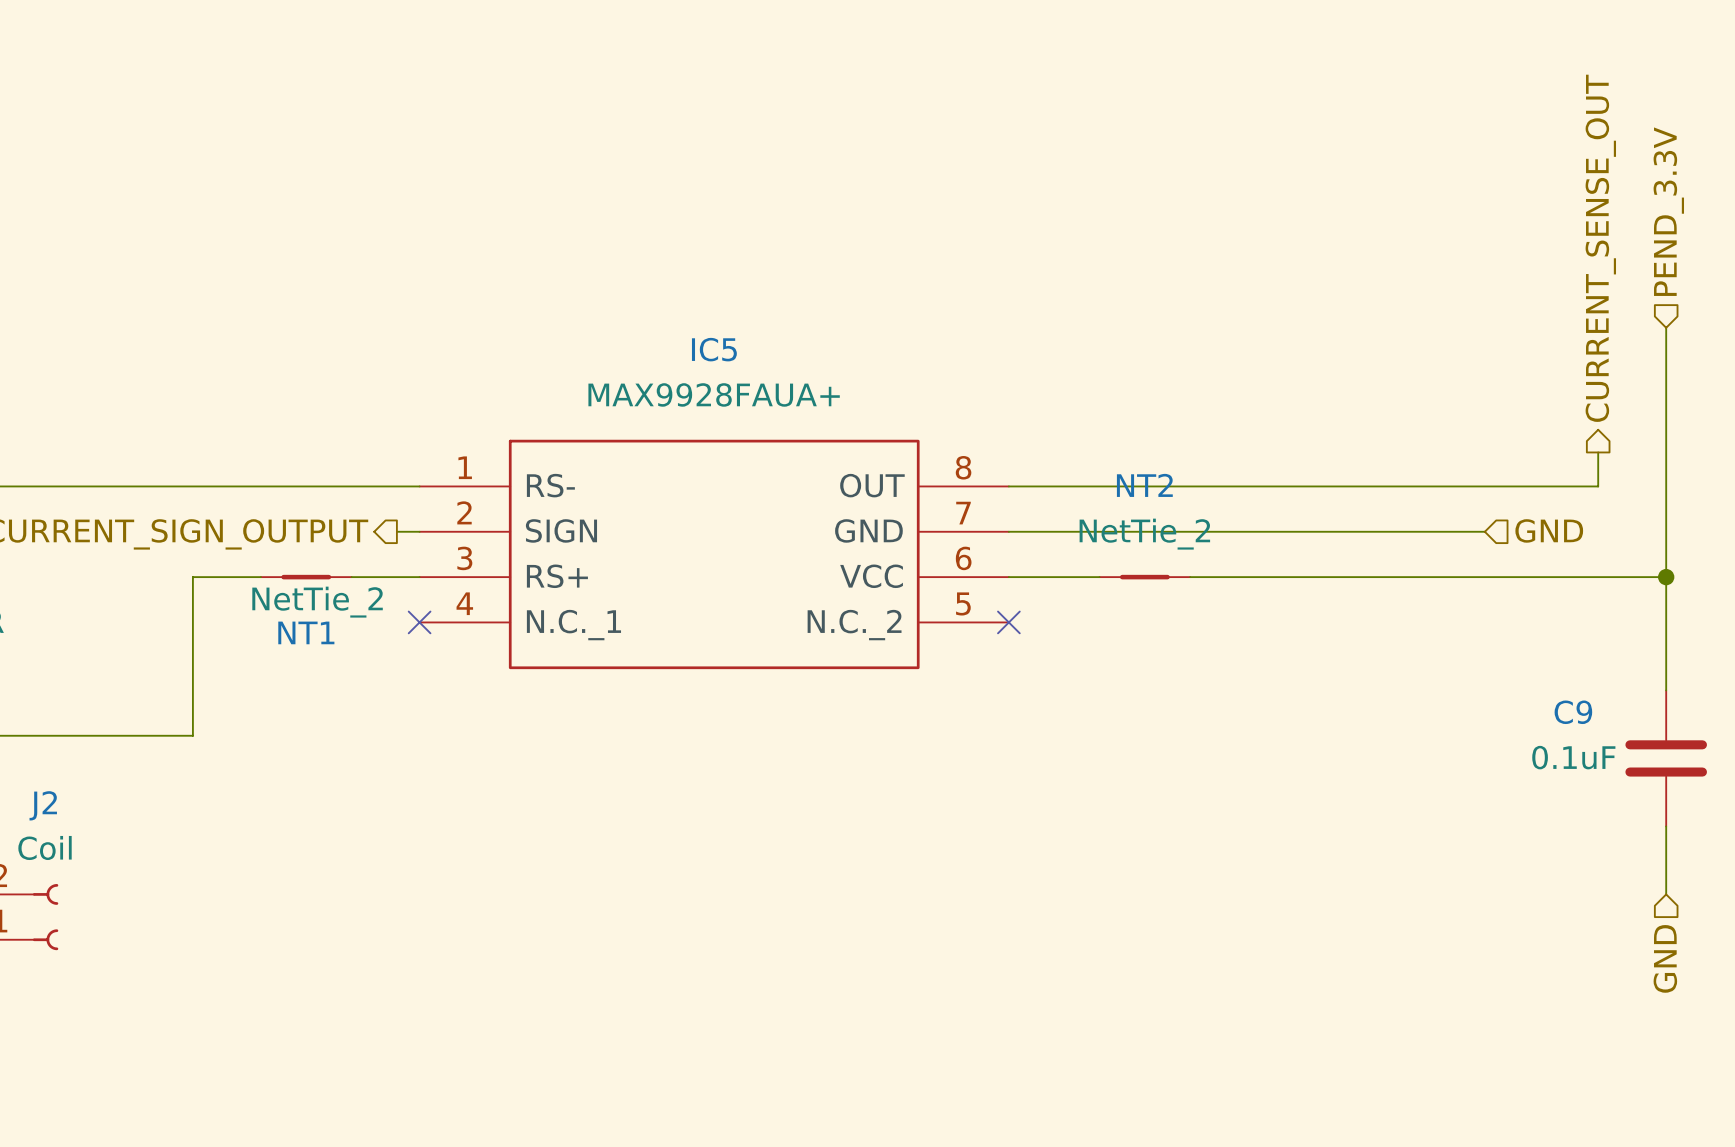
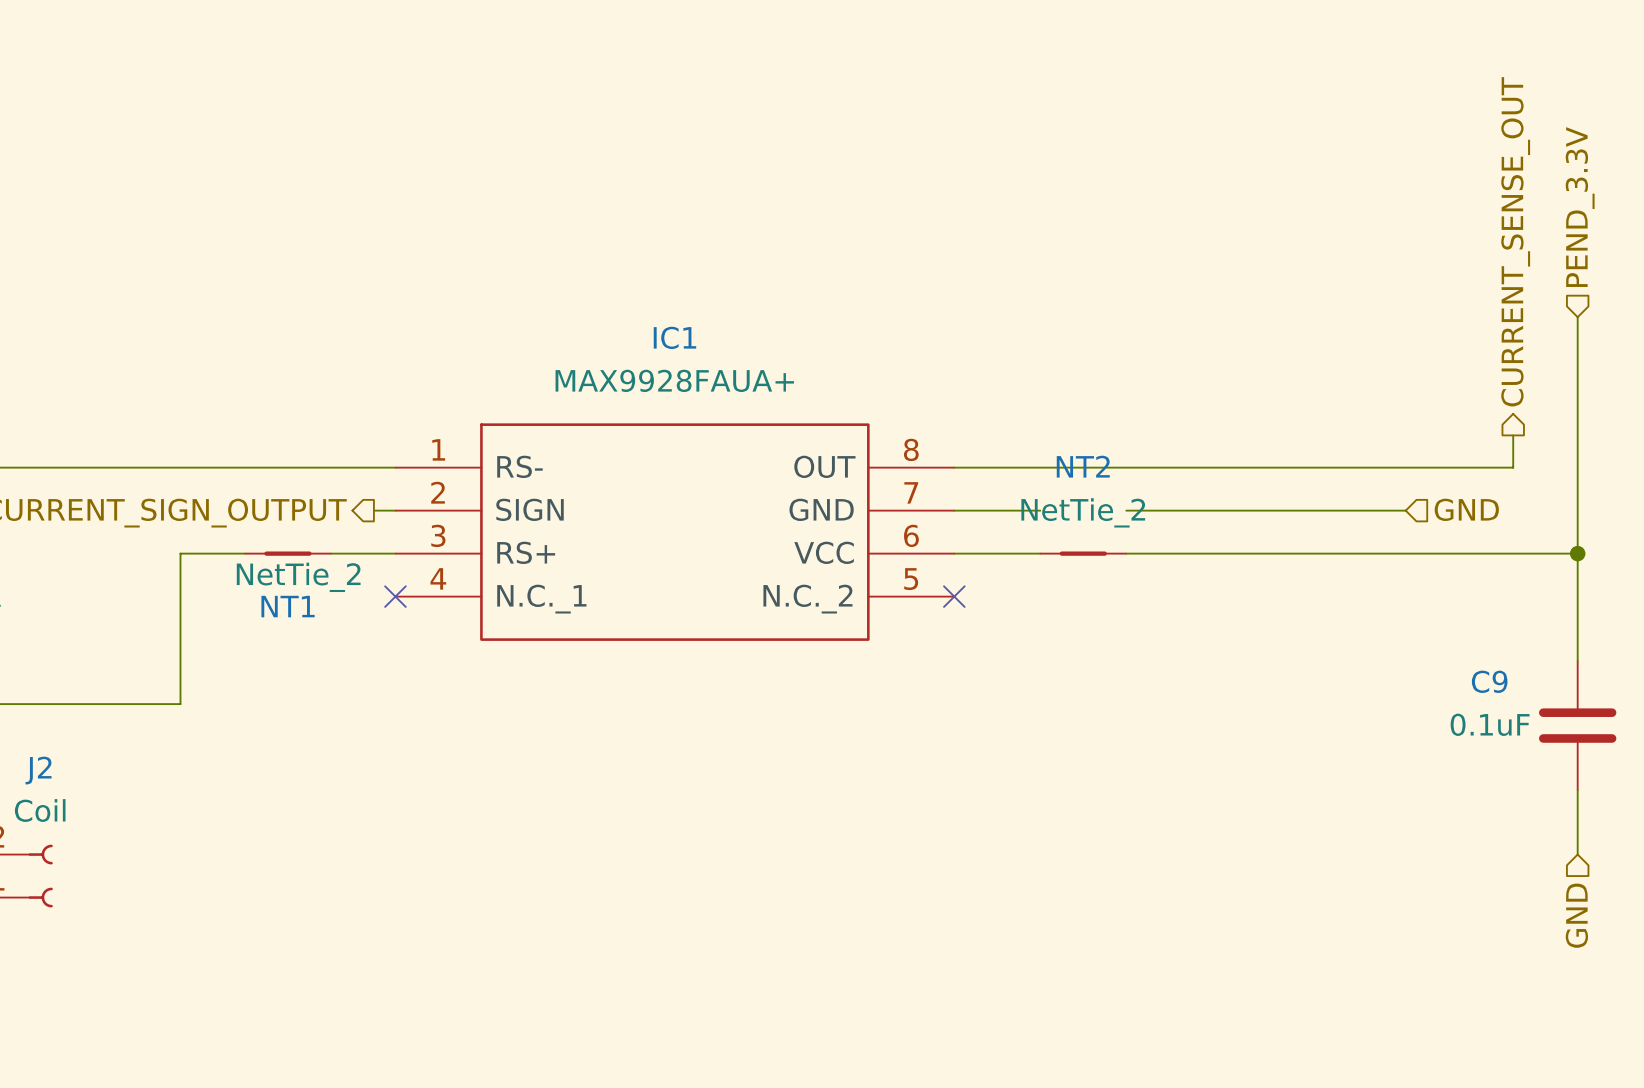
IC5 name: IC5 (714, 349) -> IC1 (674, 337)
wire: (1099, 531) (1190, 531) -> none

